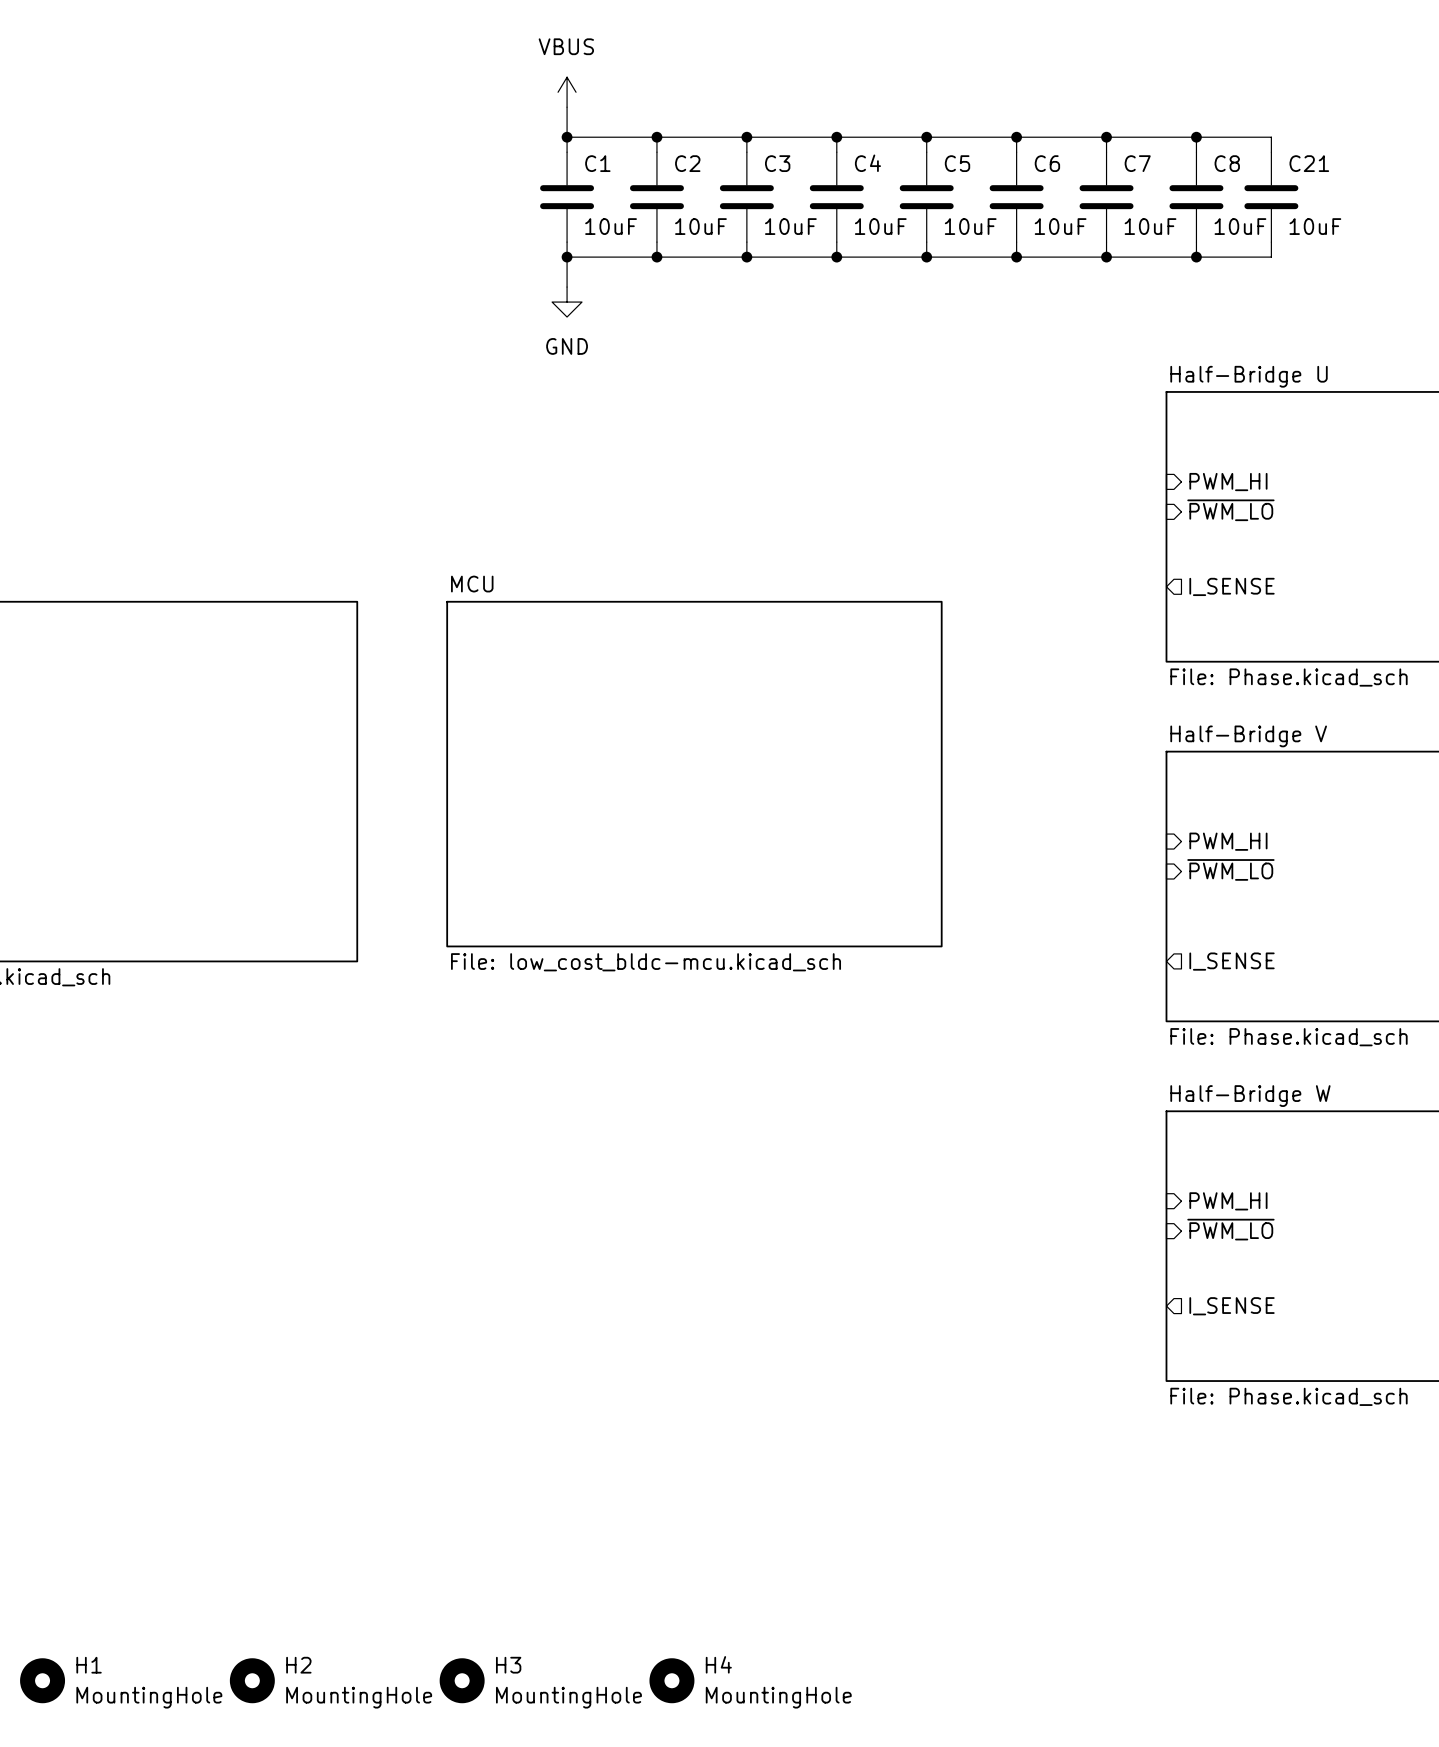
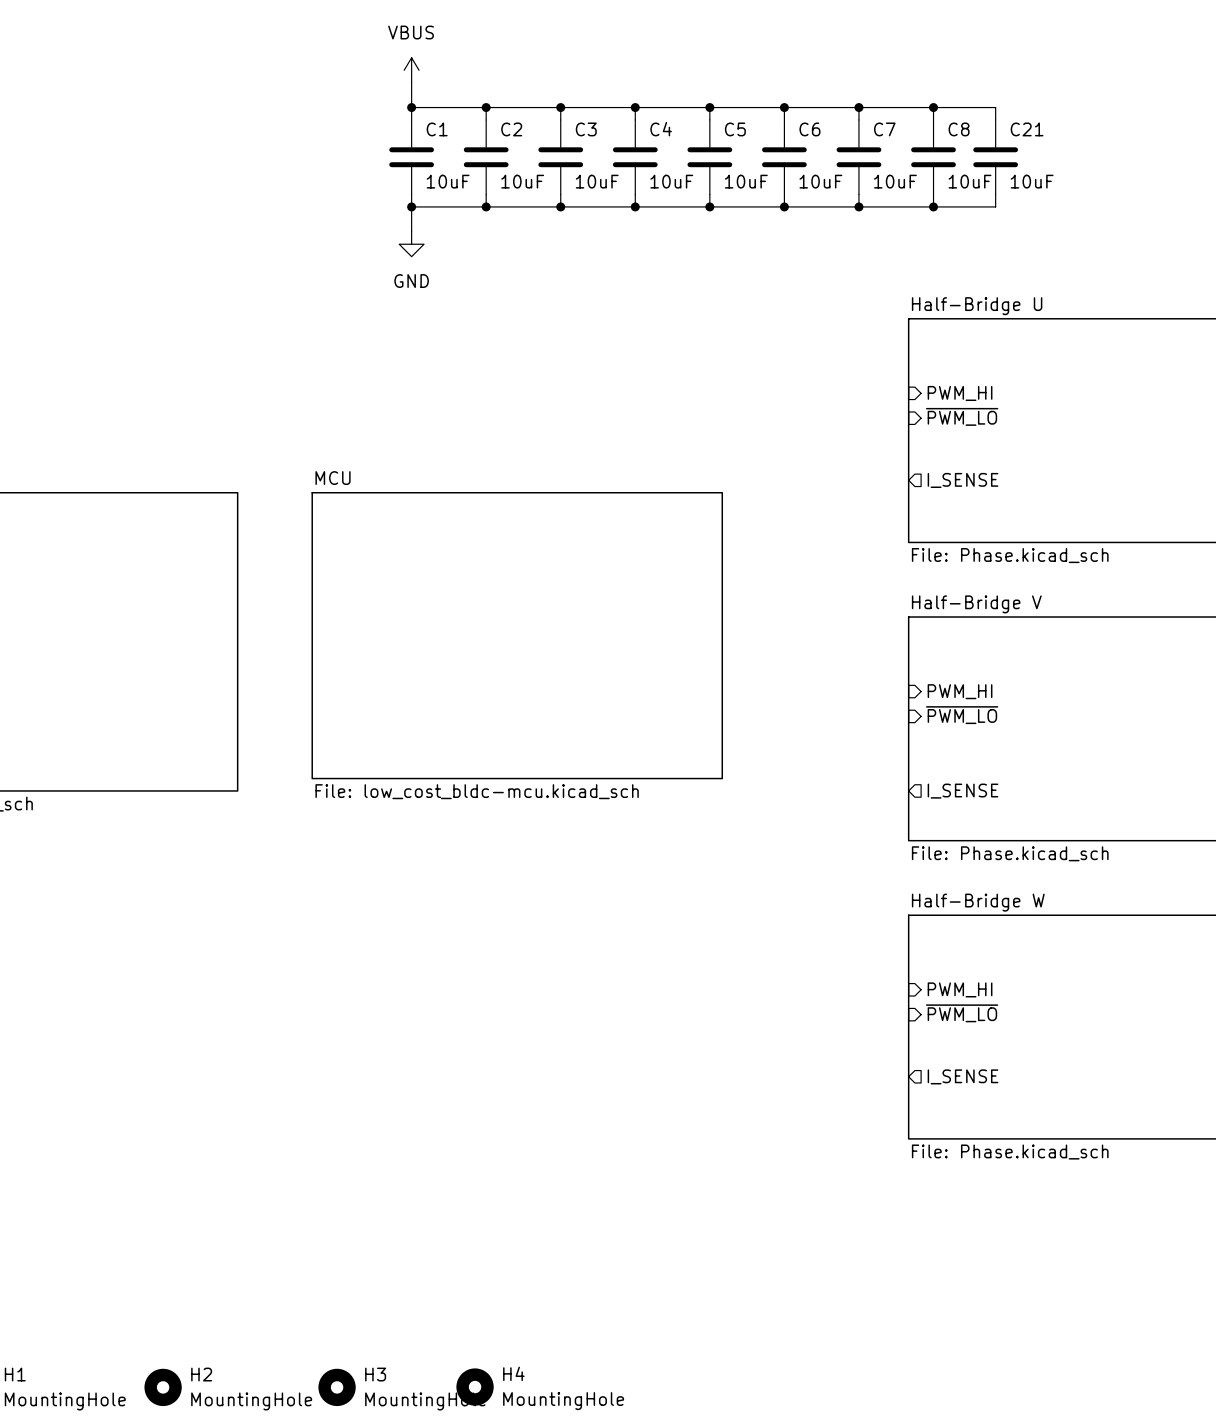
H2 position: (252, 1680) -> (163, 1387)
H3 position: (462, 1680) -> (337, 1387)
H4 position: (671, 1680) -> (475, 1387)

